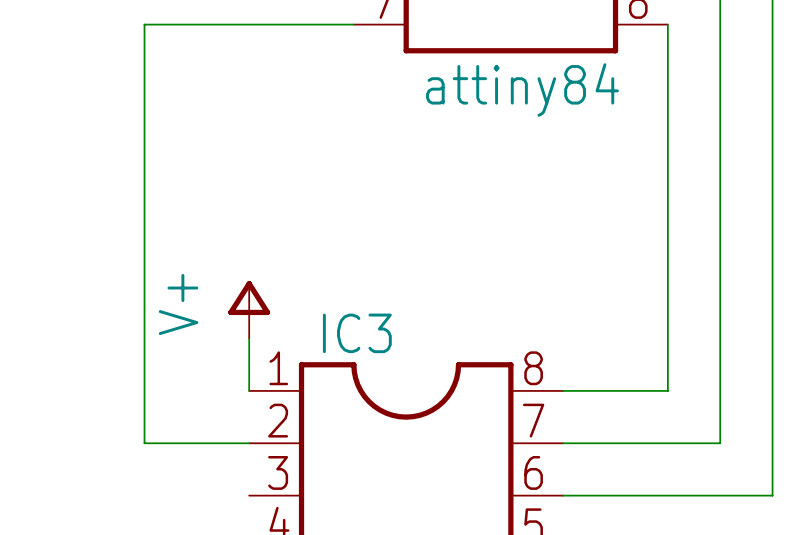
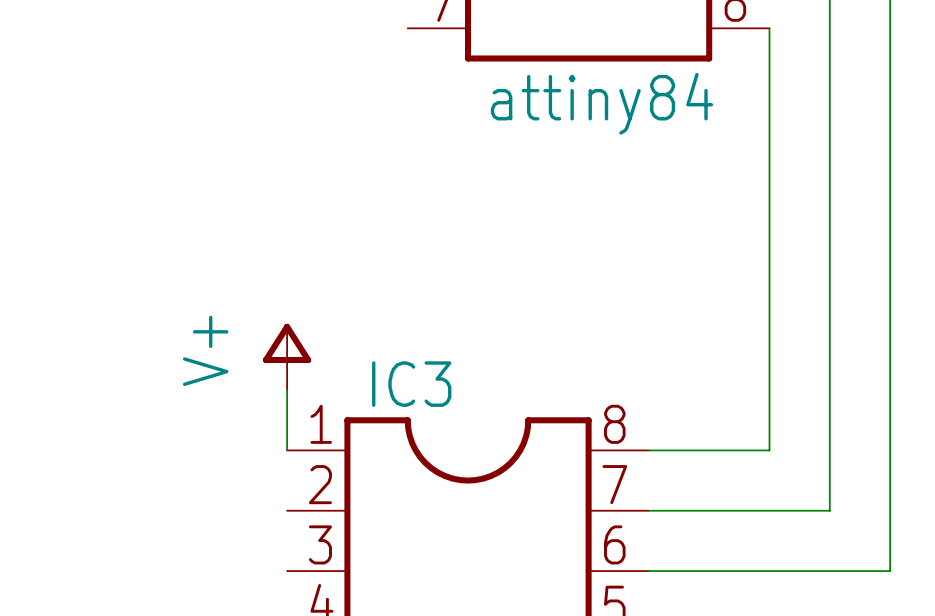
wire: (353, 24) (144, 24) (144, 443) (249, 443) -> none

